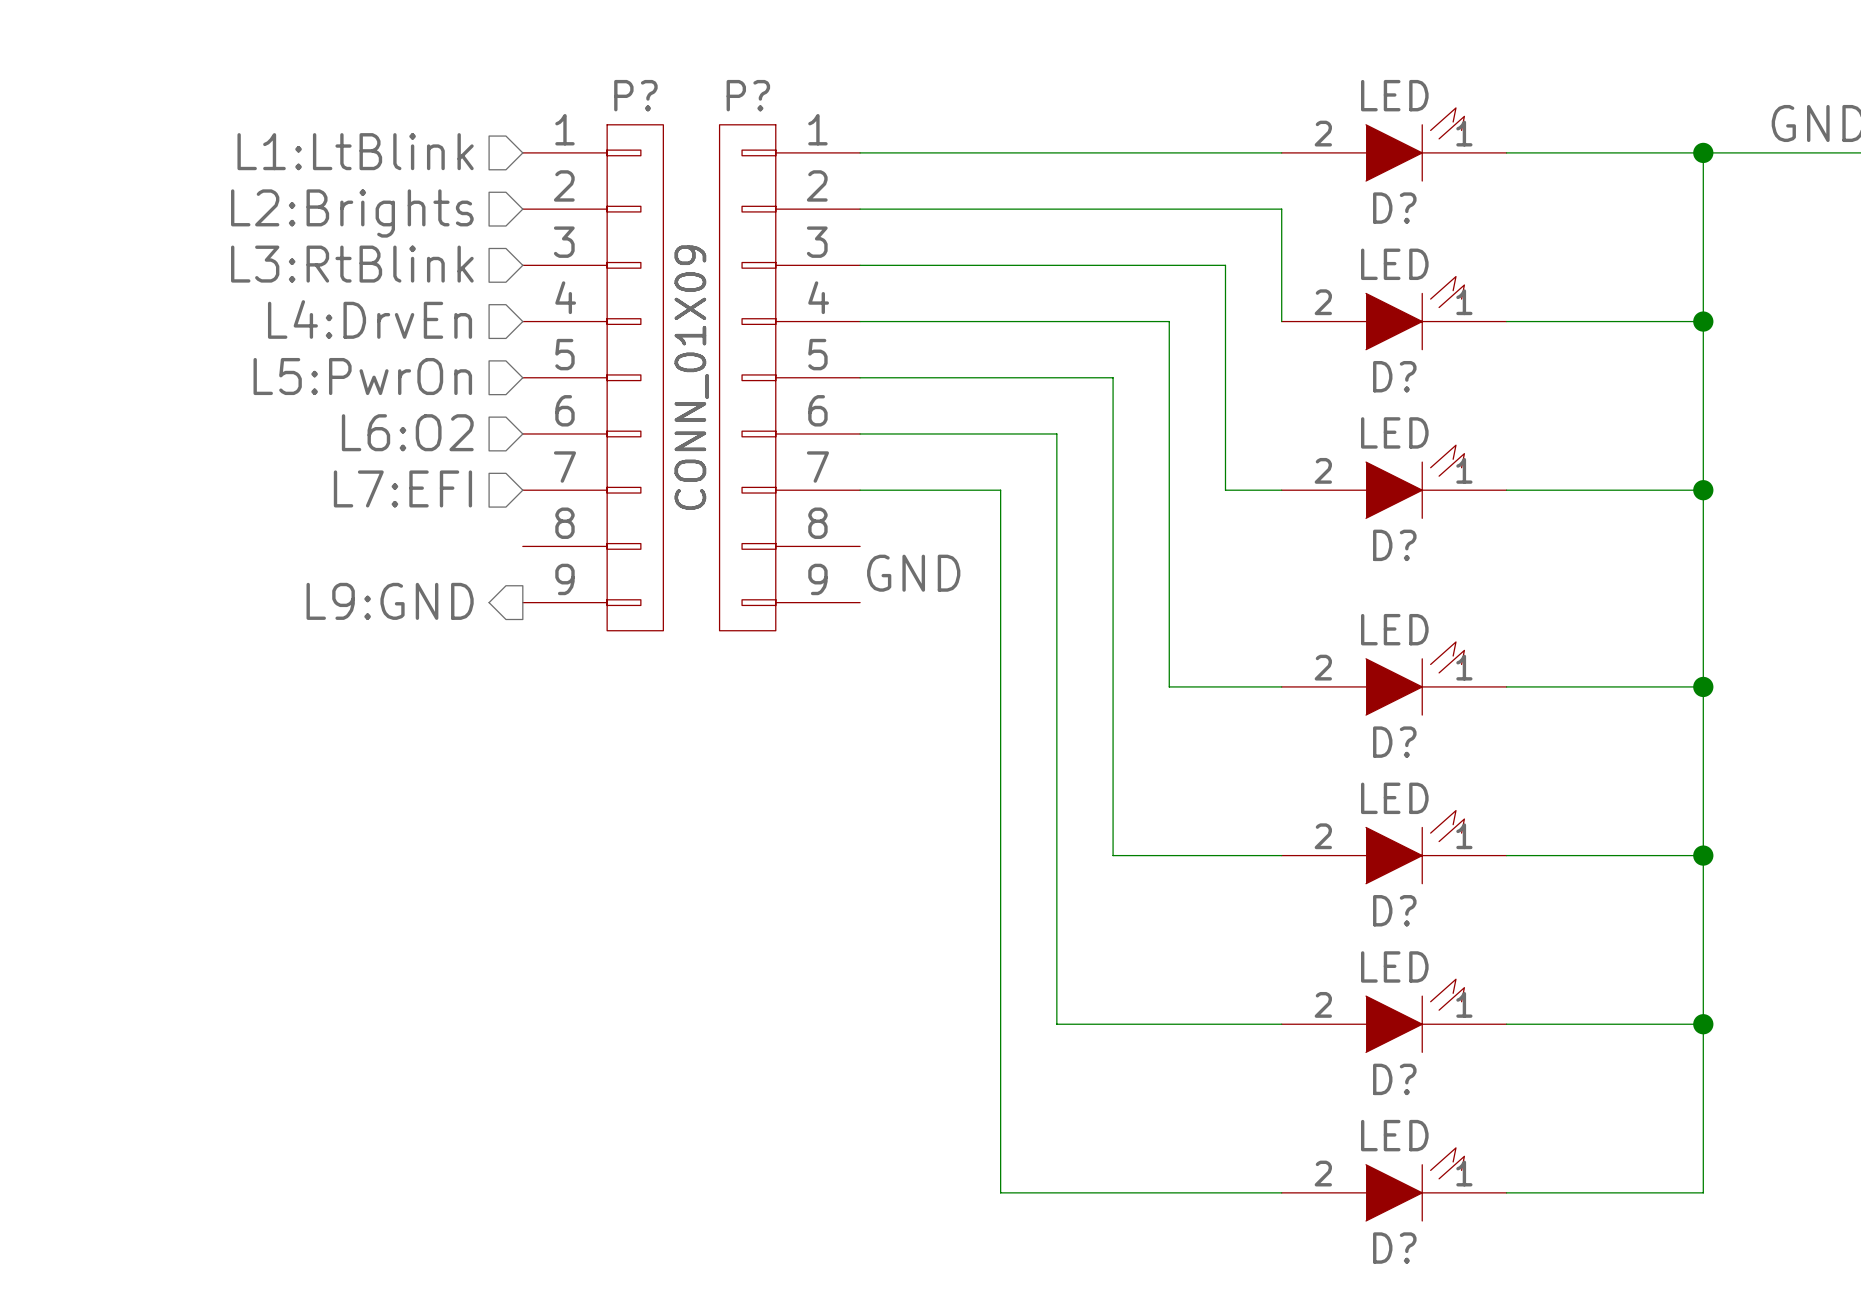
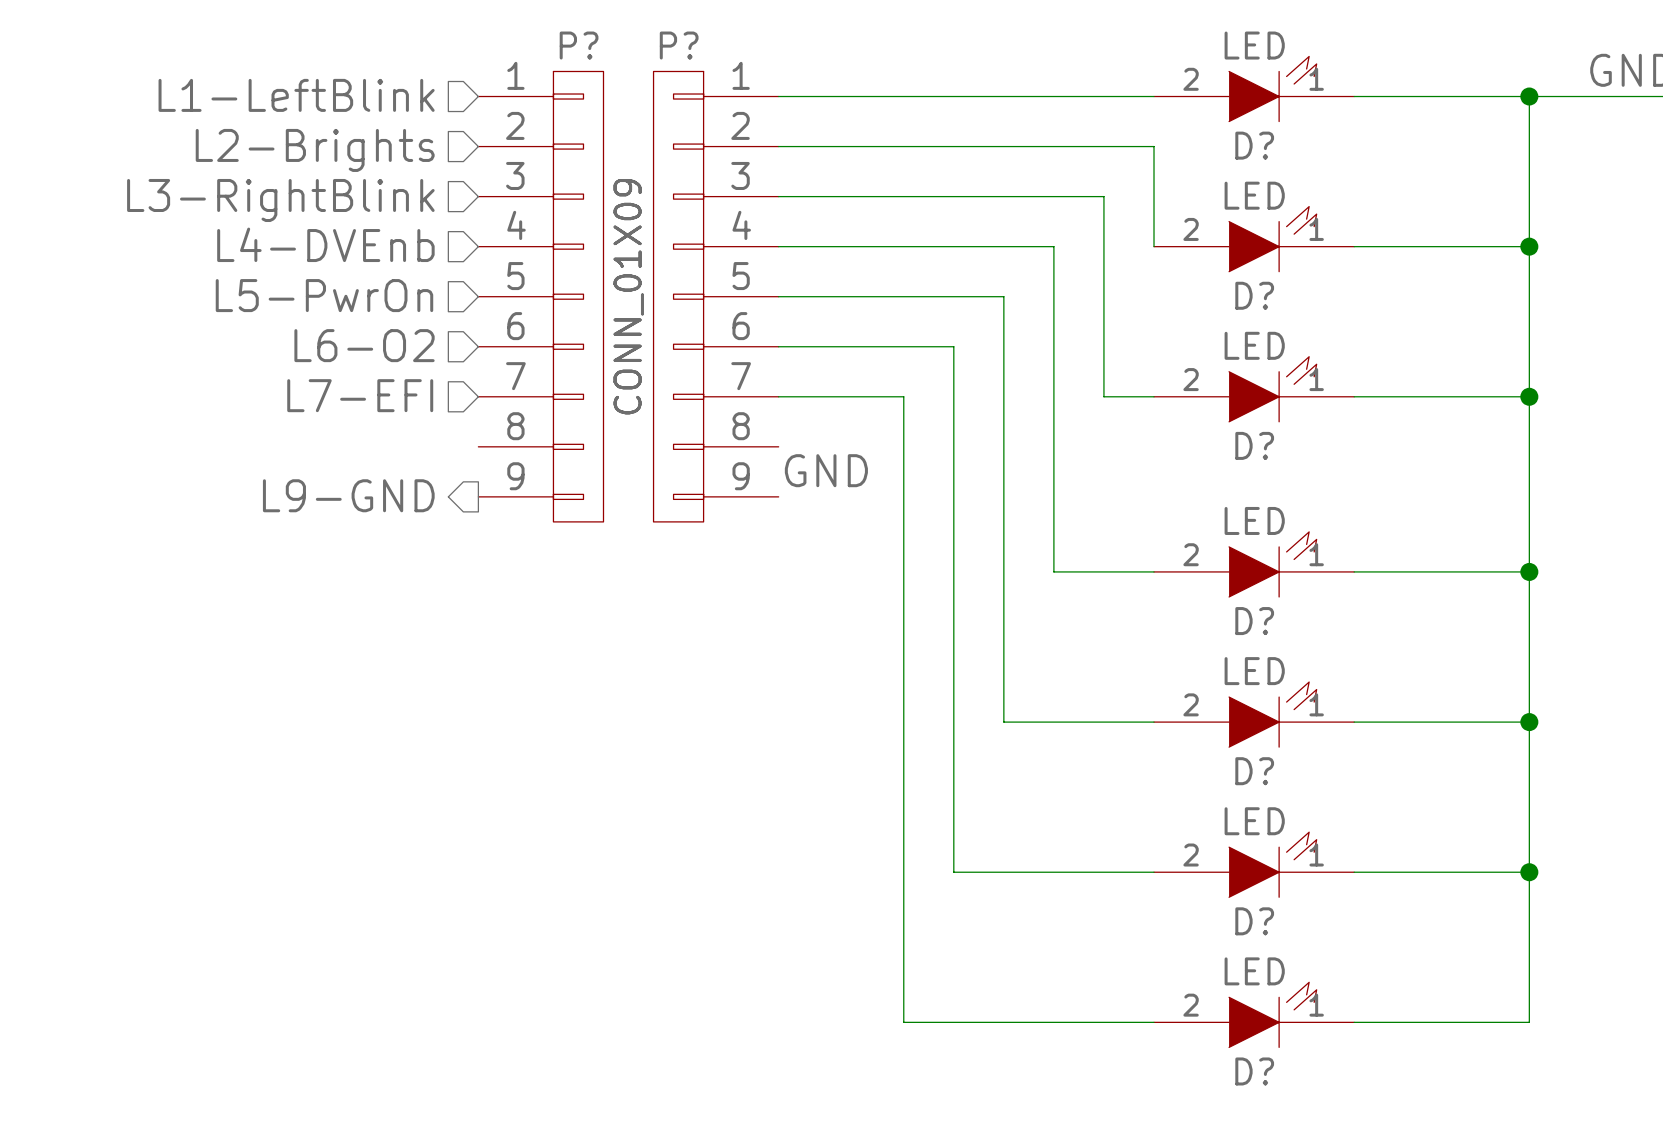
hierarchical label: L1:LtBlink (355, 151) -> L1-LeftBlink (296, 95)
hierarchical label: L2:Brights (352, 213) -> L2-Brights (315, 150)
hierarchical label: L3:RtBlink (352, 264) -> L3-RightBlink (280, 200)
hierarchical label: L4:DrvEn (370, 319) -> L4-DVEnb (325, 244)
hierarchical label: L5:PwrOn (362, 376) -> L5-PwrOn (324, 295)
hierarchical label: L6:O2 (407, 432) -> L6-O2 (364, 345)
hierarchical label: L7:EFI (402, 488) -> L7-EFI (360, 395)
hierarchical label: L9:GND (390, 601) -> L9-GND (348, 495)

